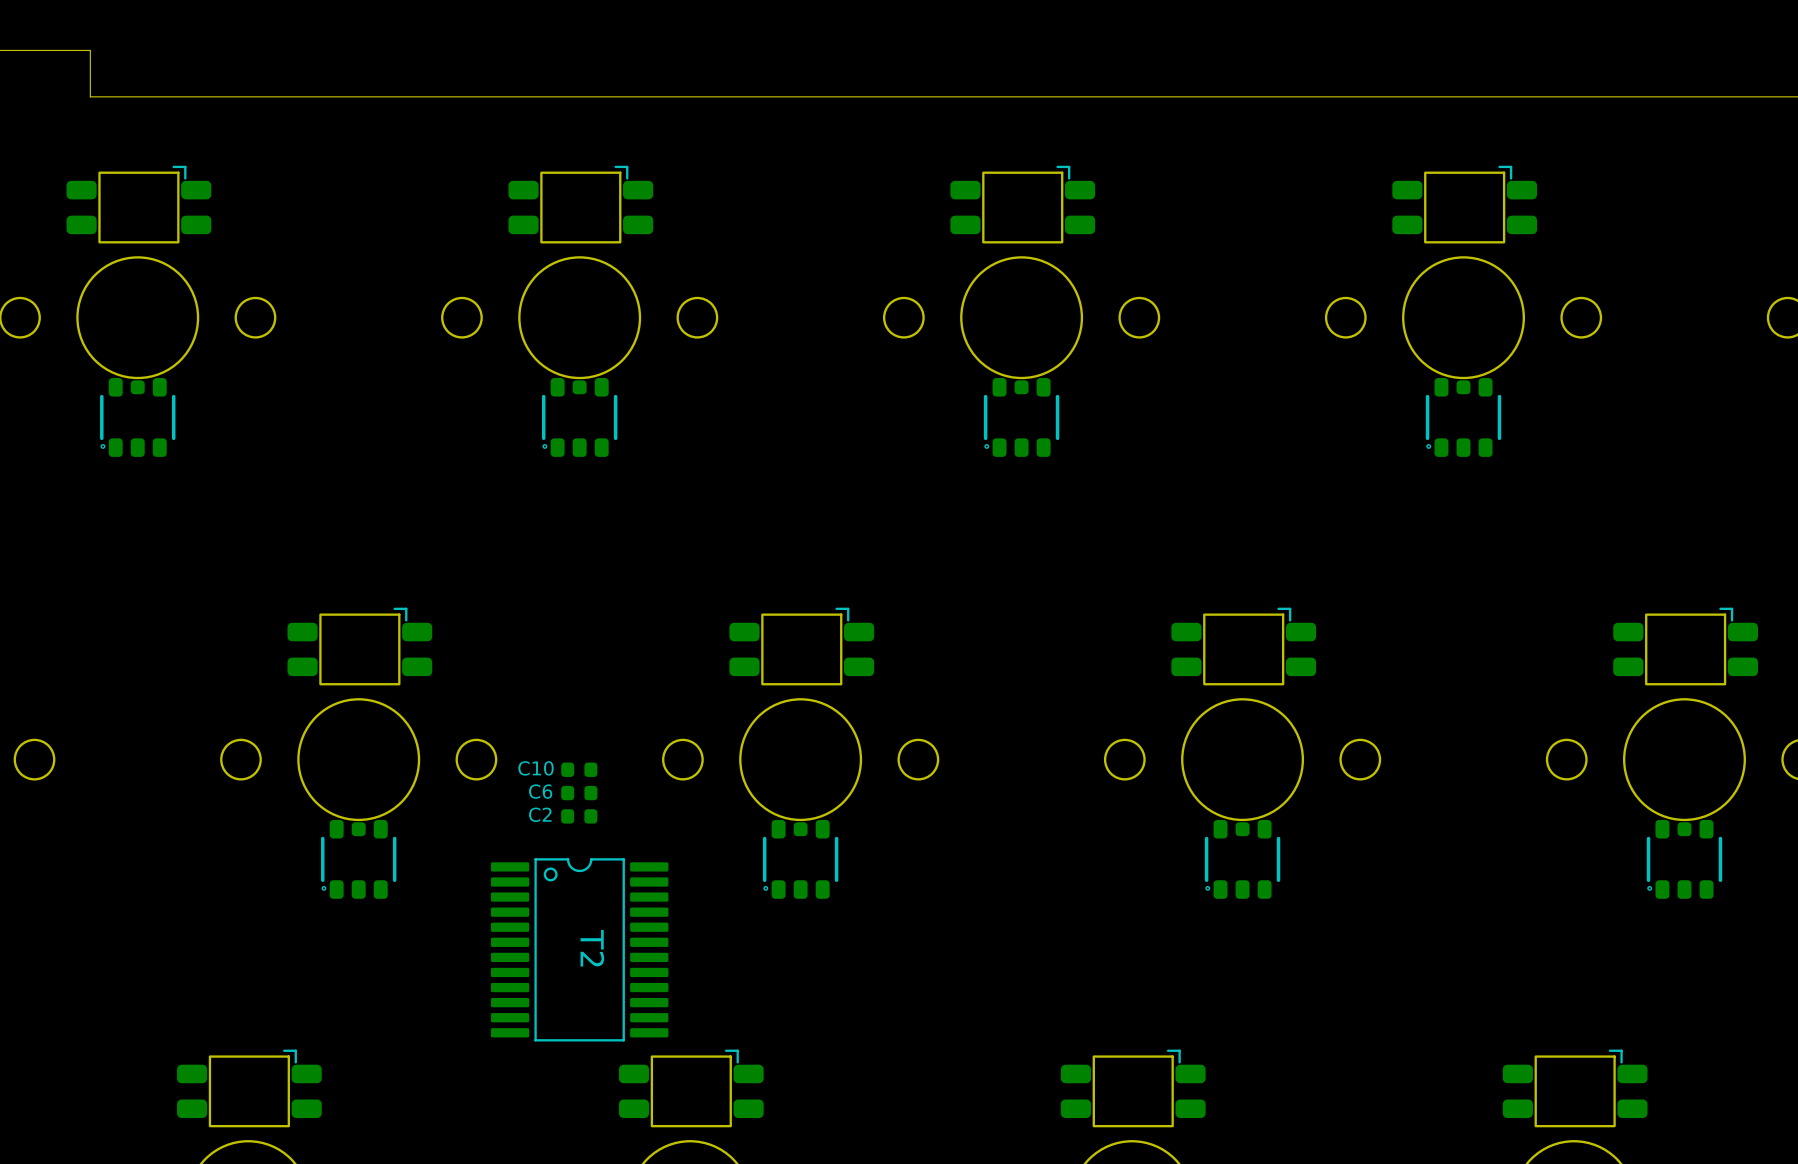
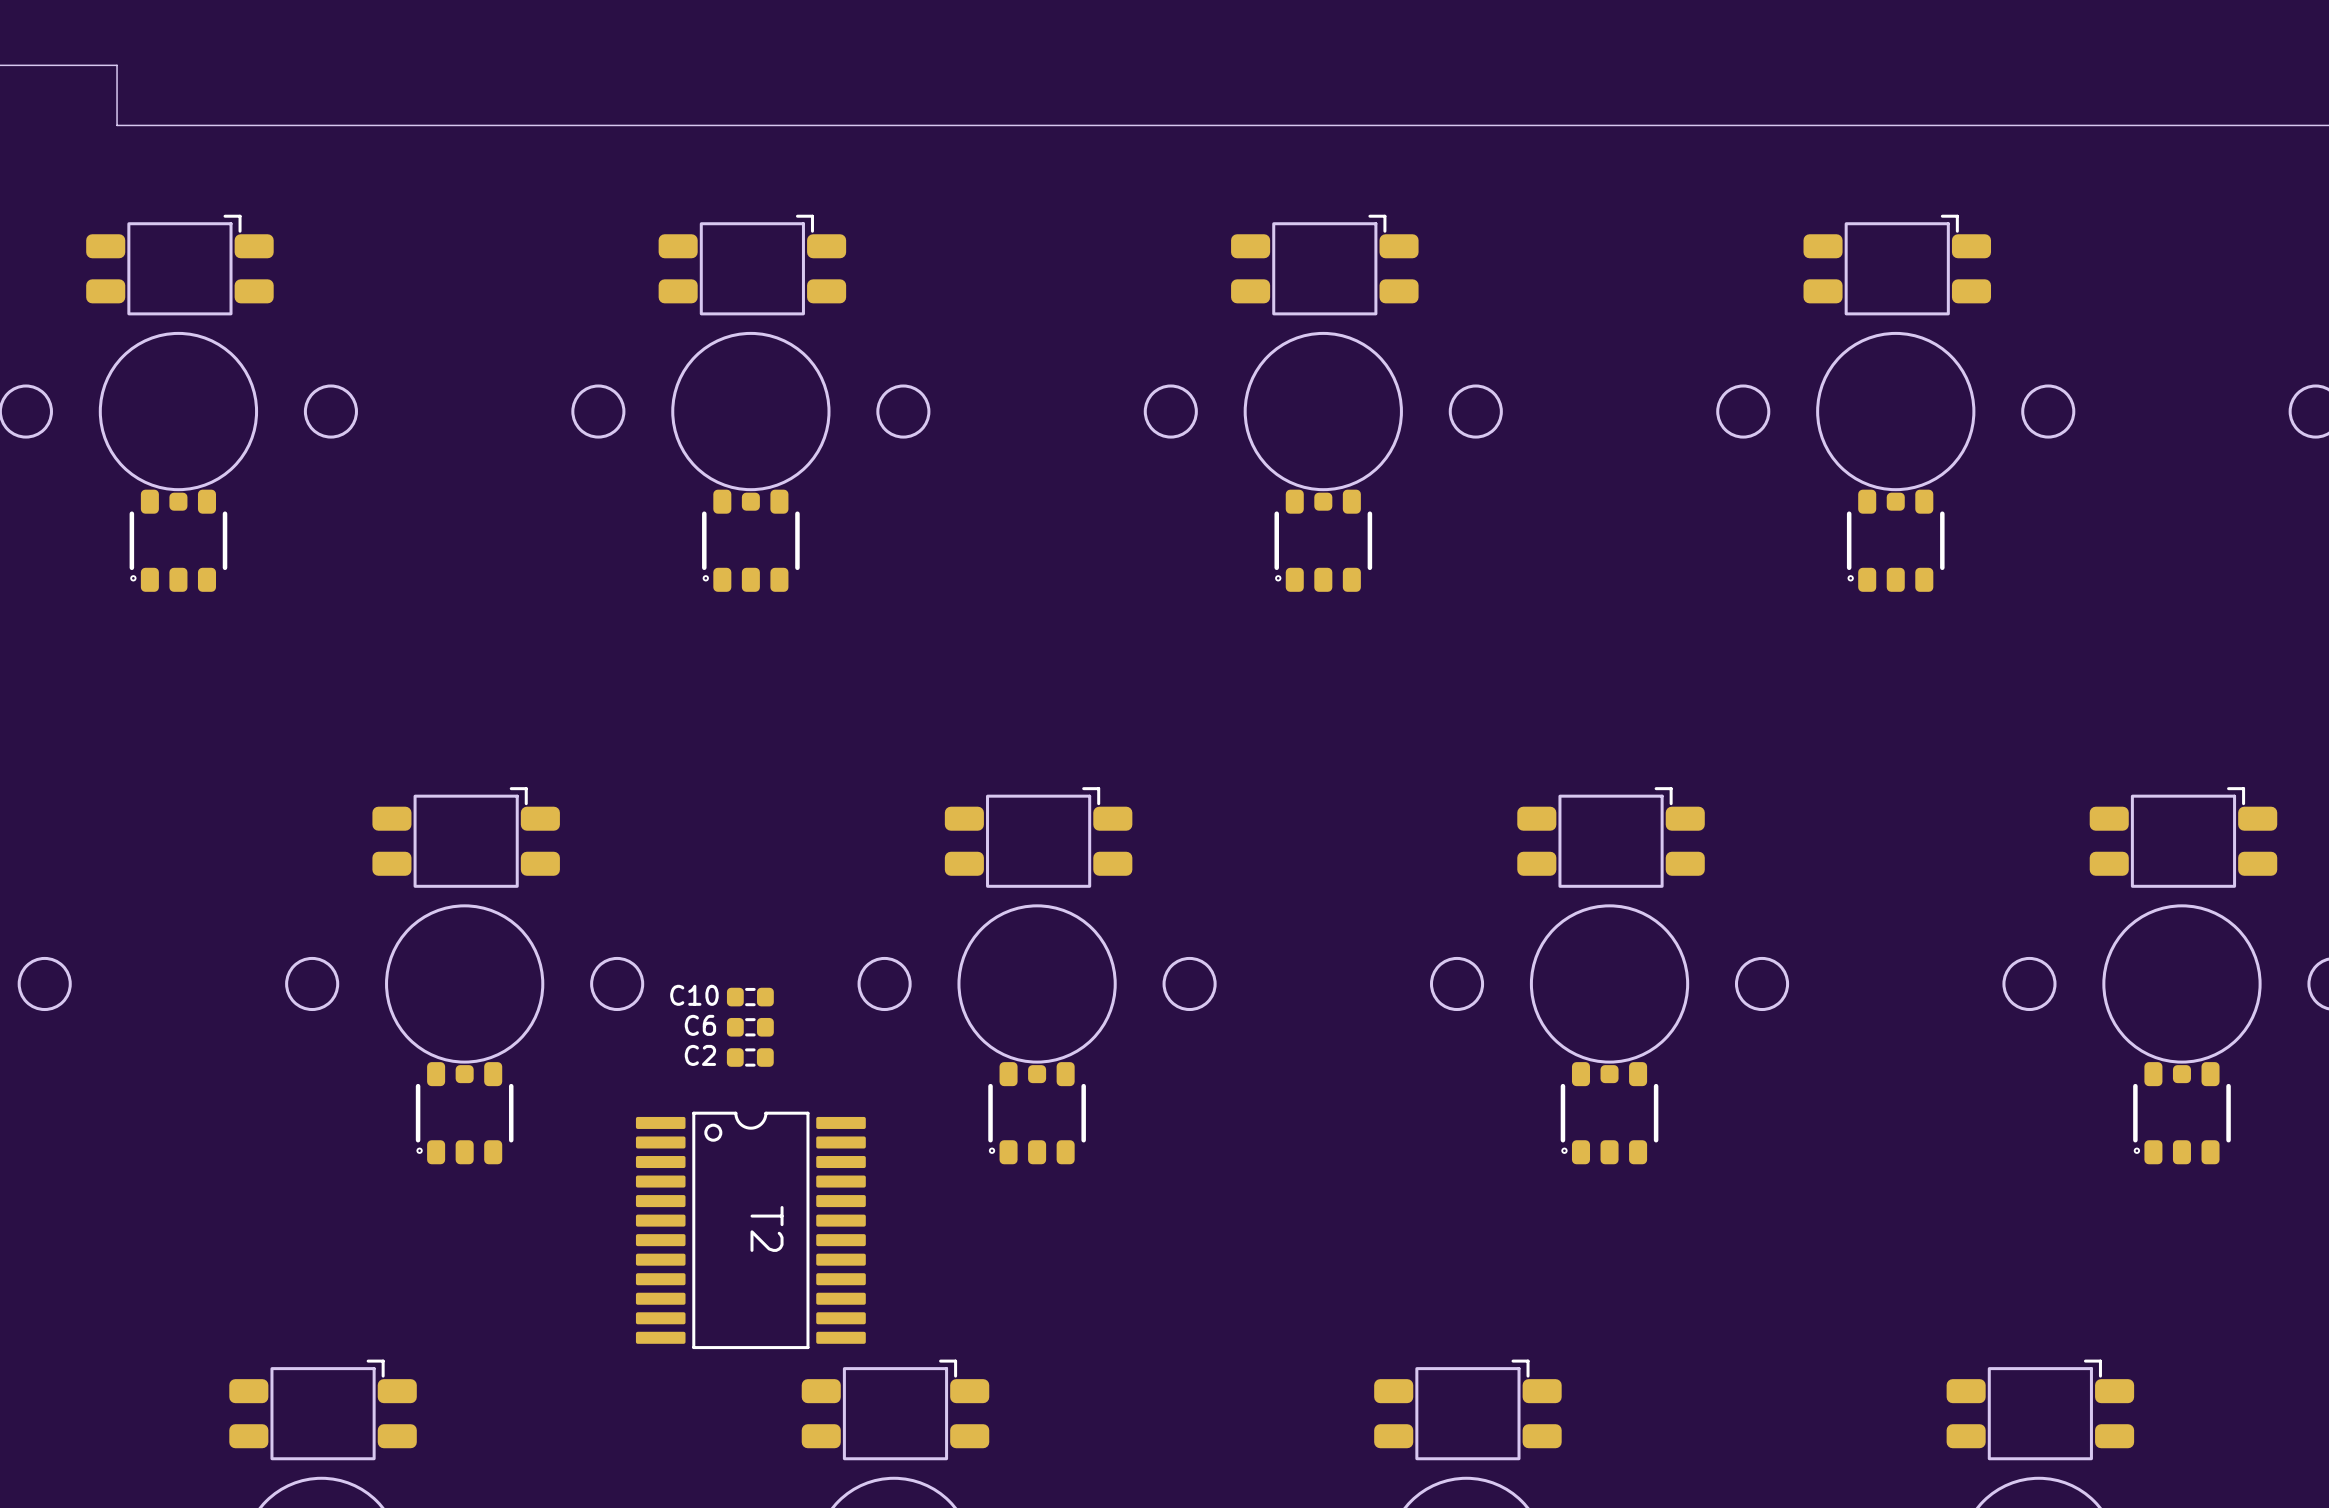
C10 footprint: [561, 762, 598, 777] -> [726, 987, 774, 1007]
C6 footprint: [561, 785, 598, 801] -> [726, 1017, 774, 1037]
C2 footprint: [561, 809, 598, 824] -> [726, 1048, 774, 1067]

